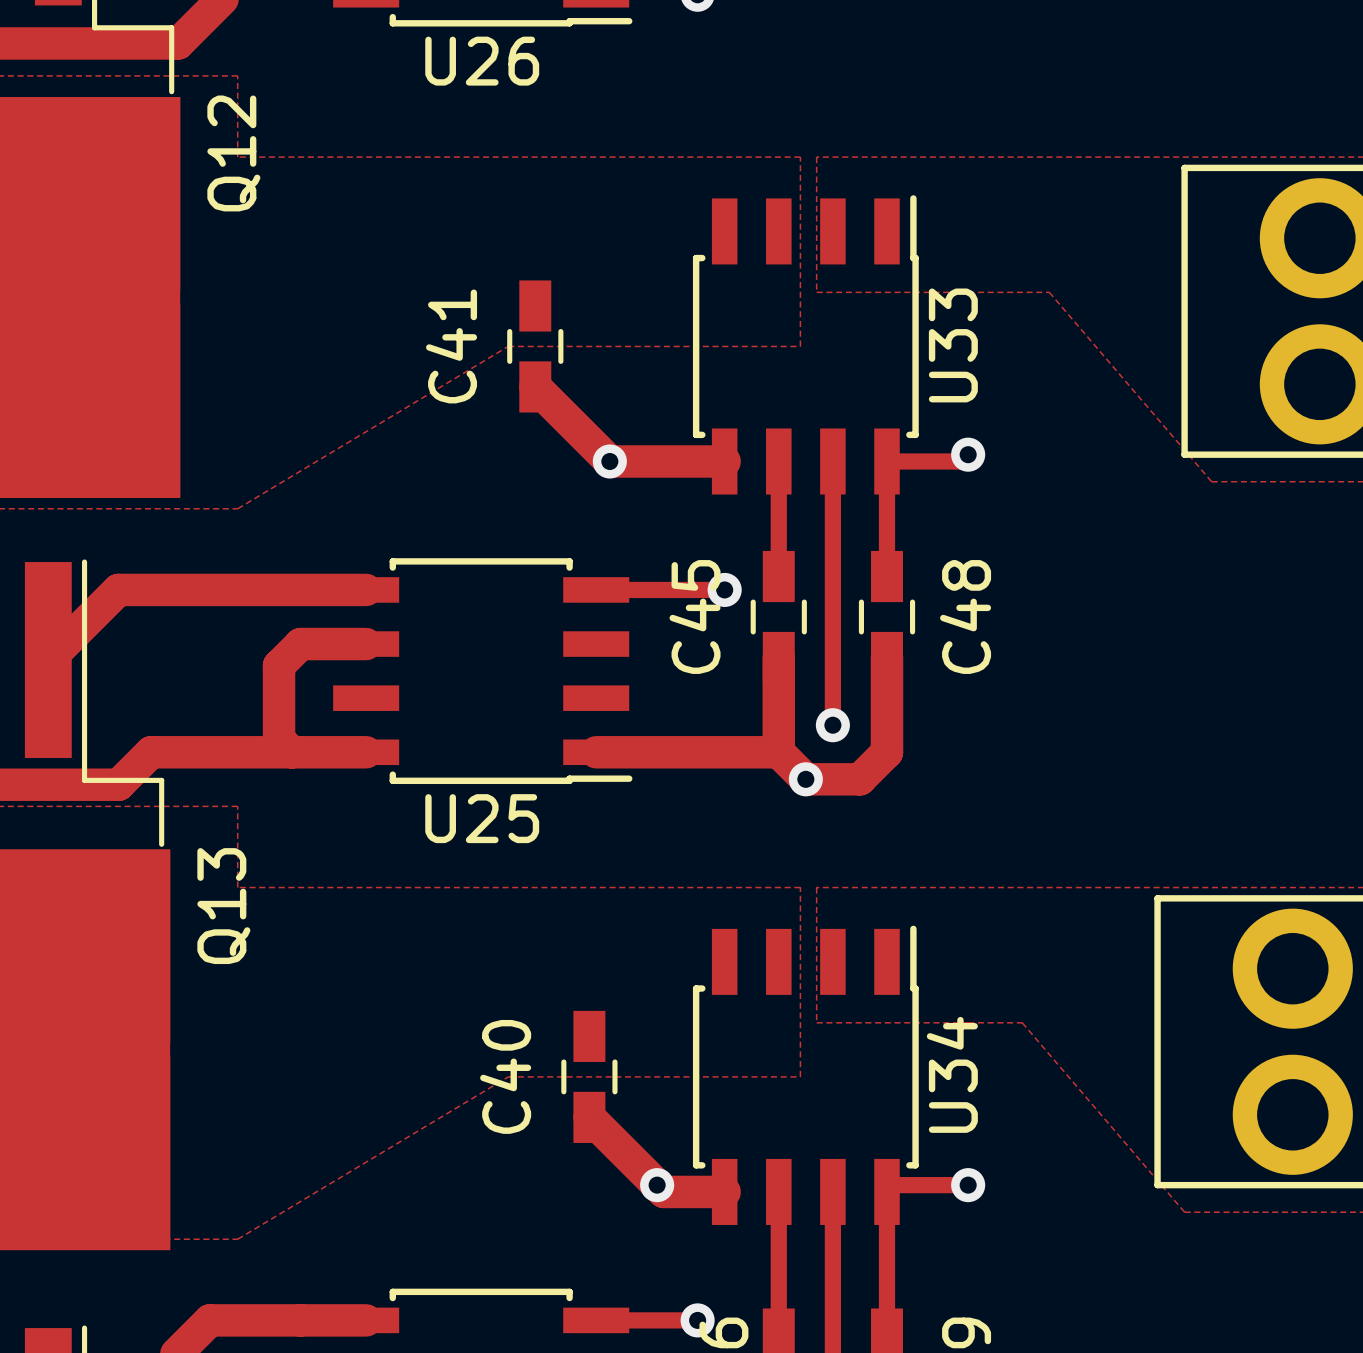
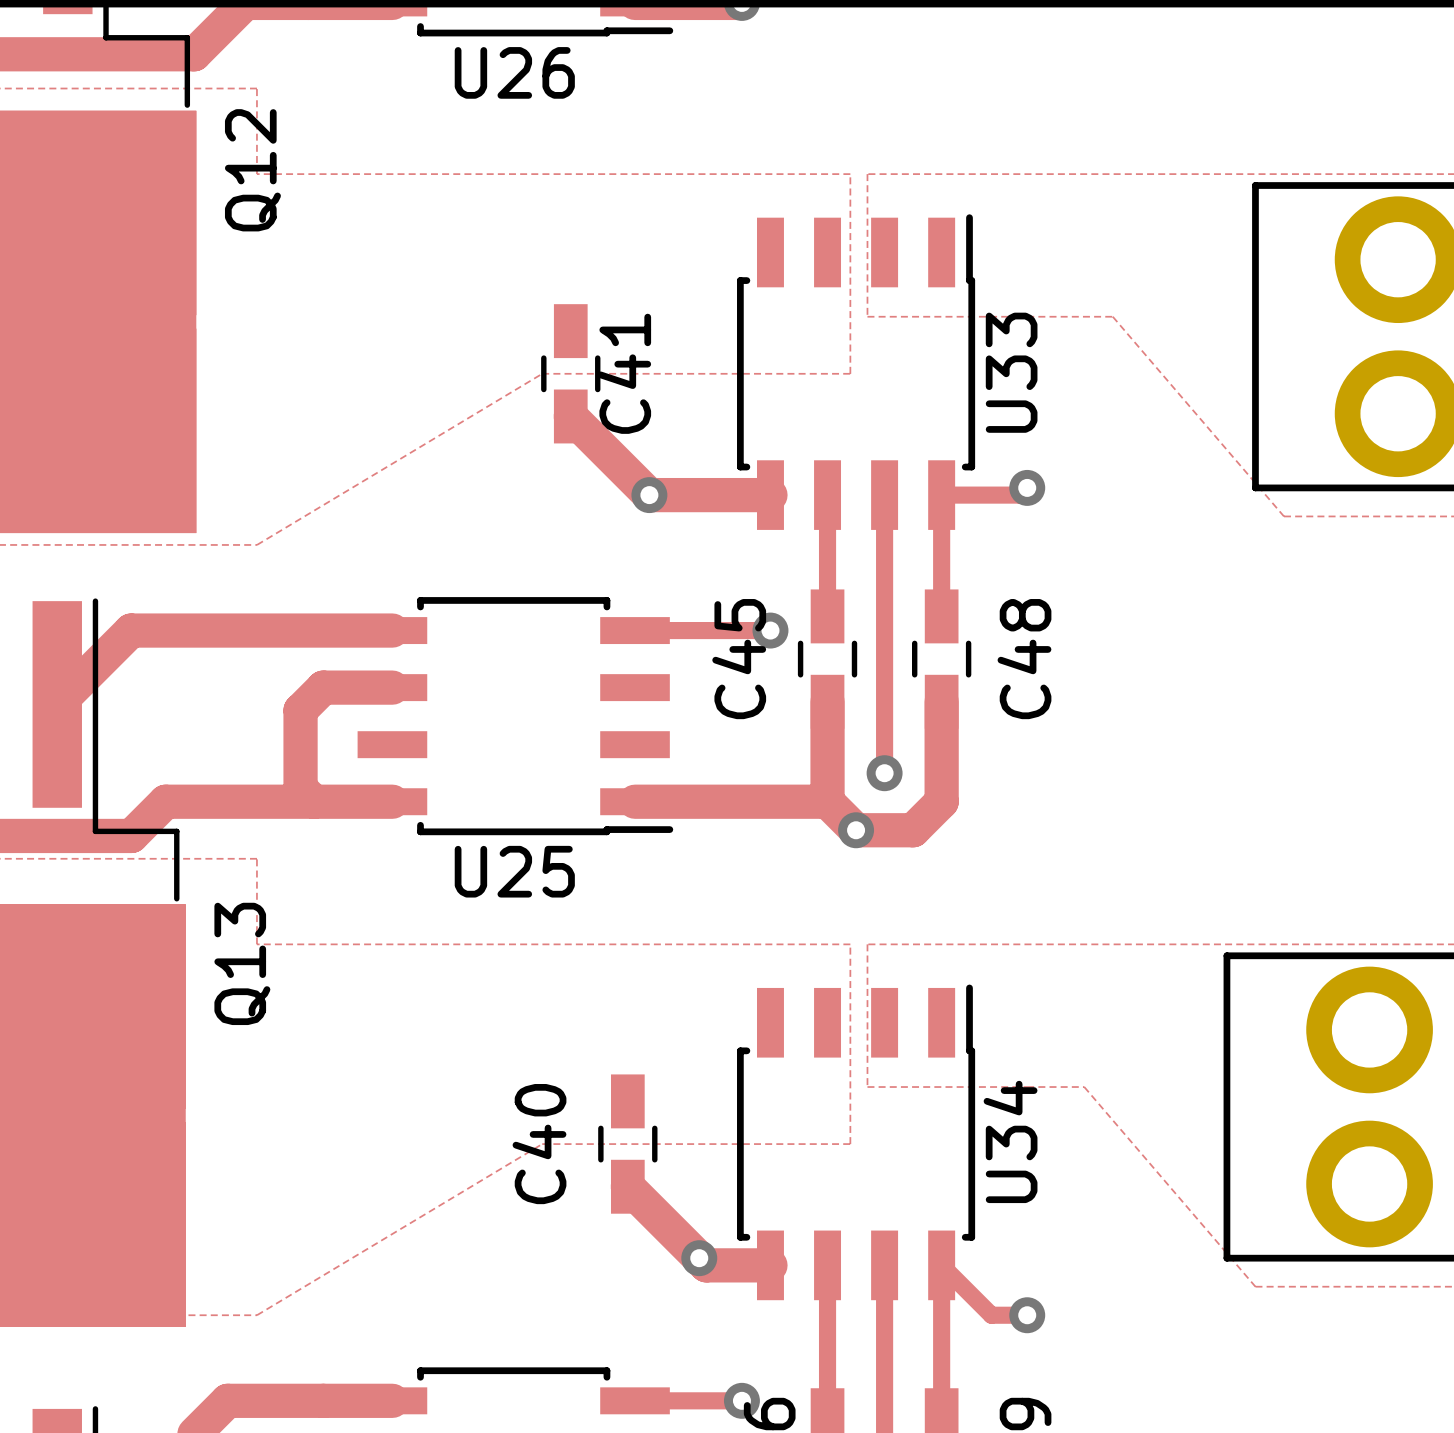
C41 name position: C41 (451, 346) -> C41 (624, 373)
track: (968, 1185) (893, 1185) (887, 1191) -> (1027, 1315) (991, 1315) (941, 1265)
via position: (968, 1185) -> (1027, 1315)

